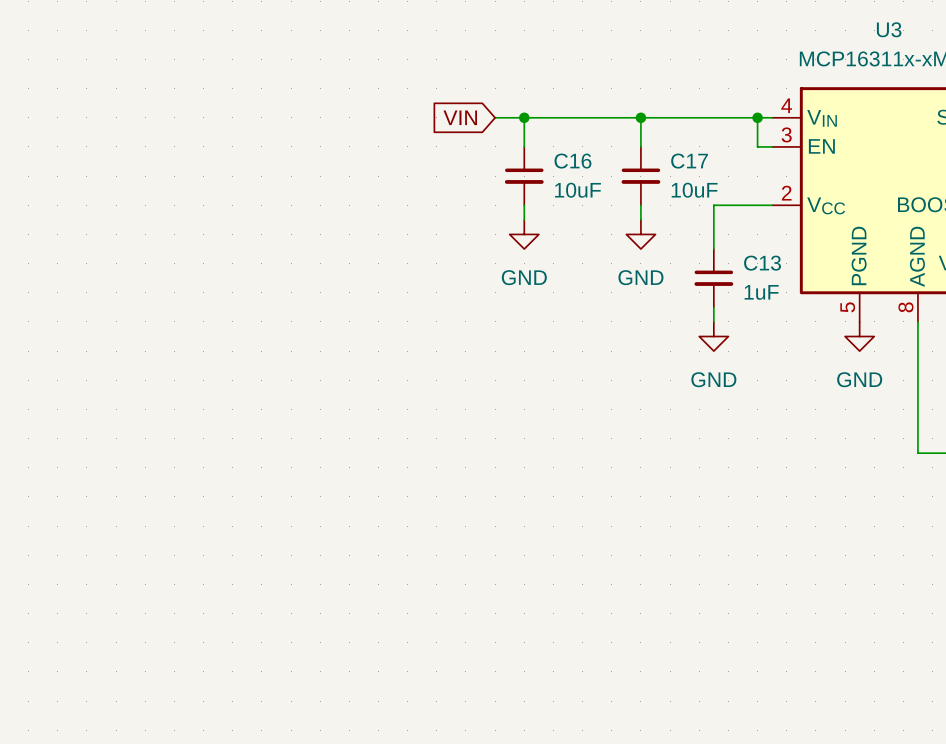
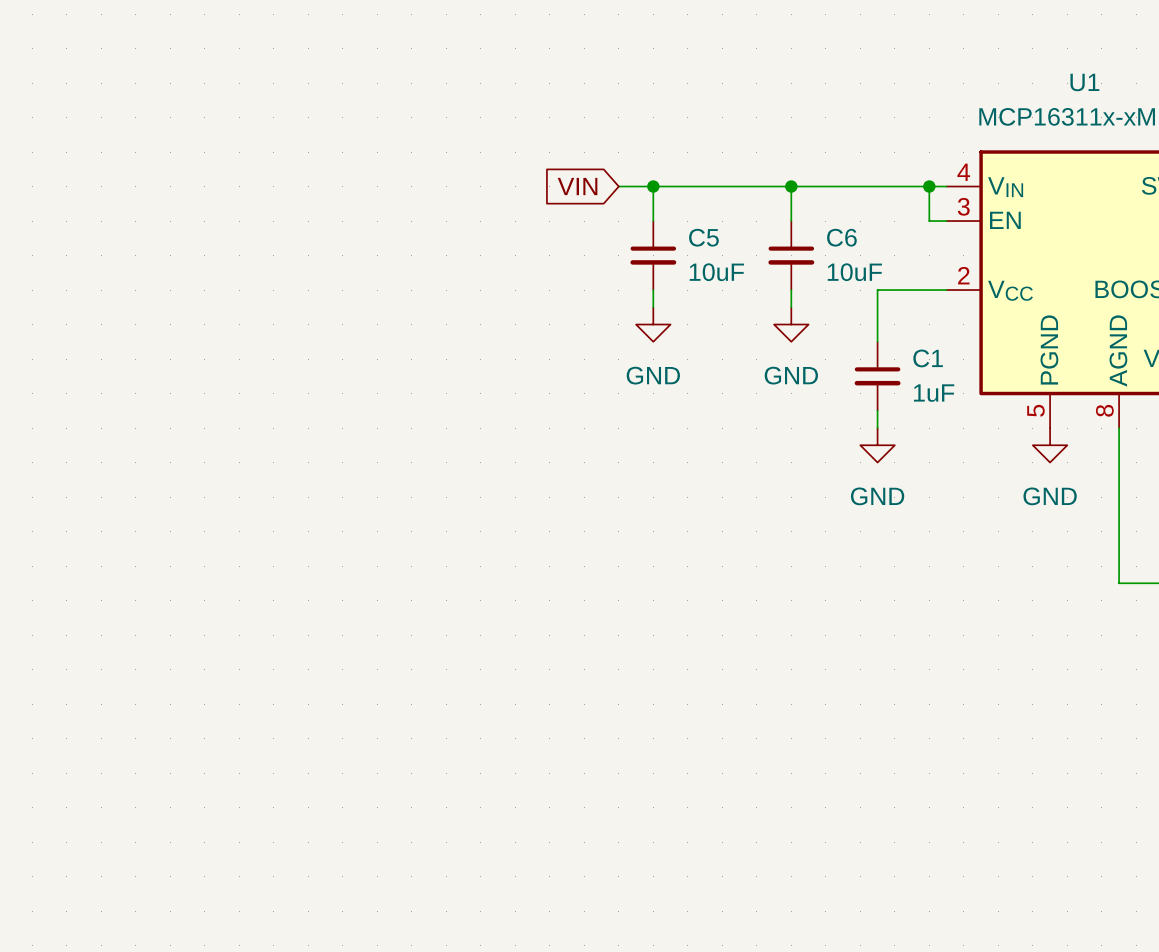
U3 name: U3 (889, 29) -> U1 (1084, 82)
C16 name: C16 (572, 161) -> C5 (703, 237)
C17 name: C17 (689, 161) -> C6 (841, 237)
C13 name: C13 (762, 263) -> C1 (928, 358)

